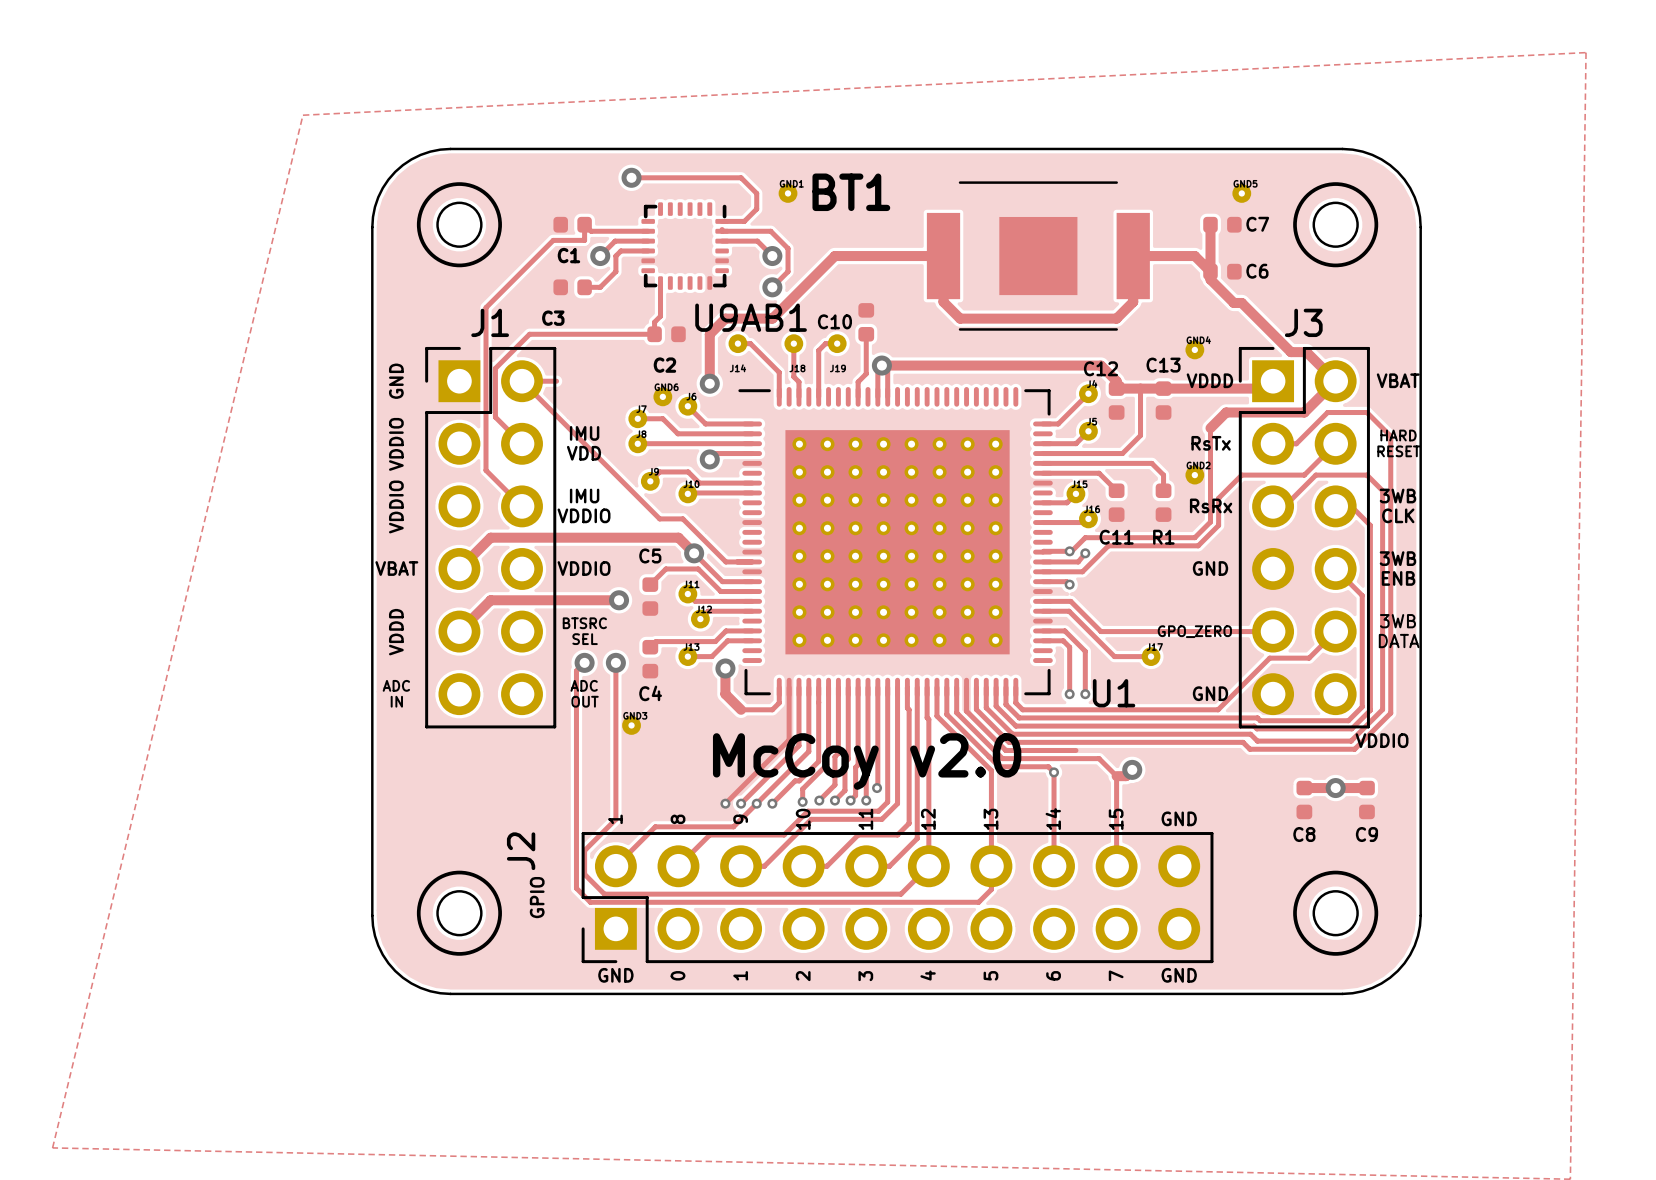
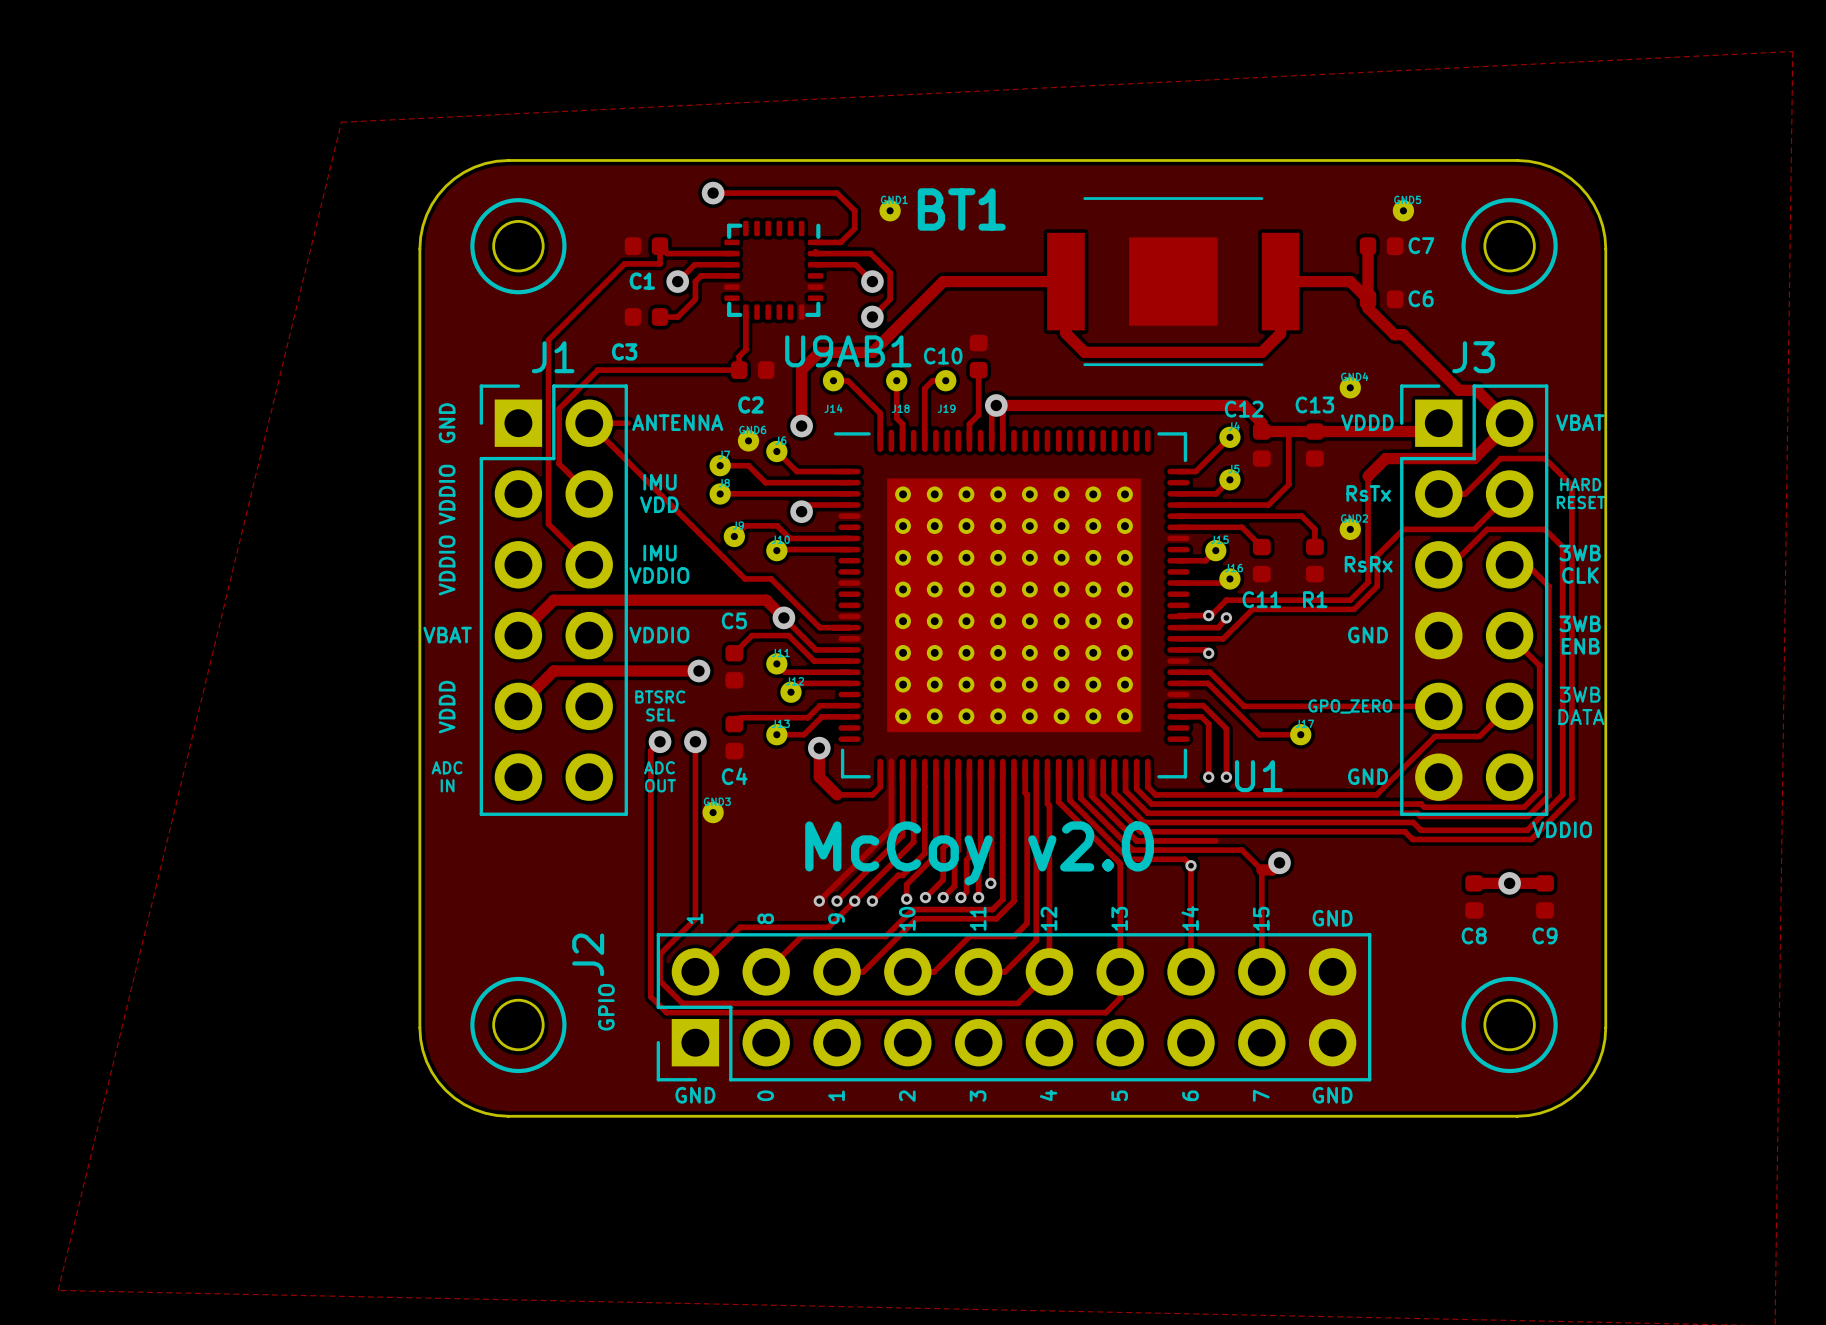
text: none -> ANTENNA (677, 422)

